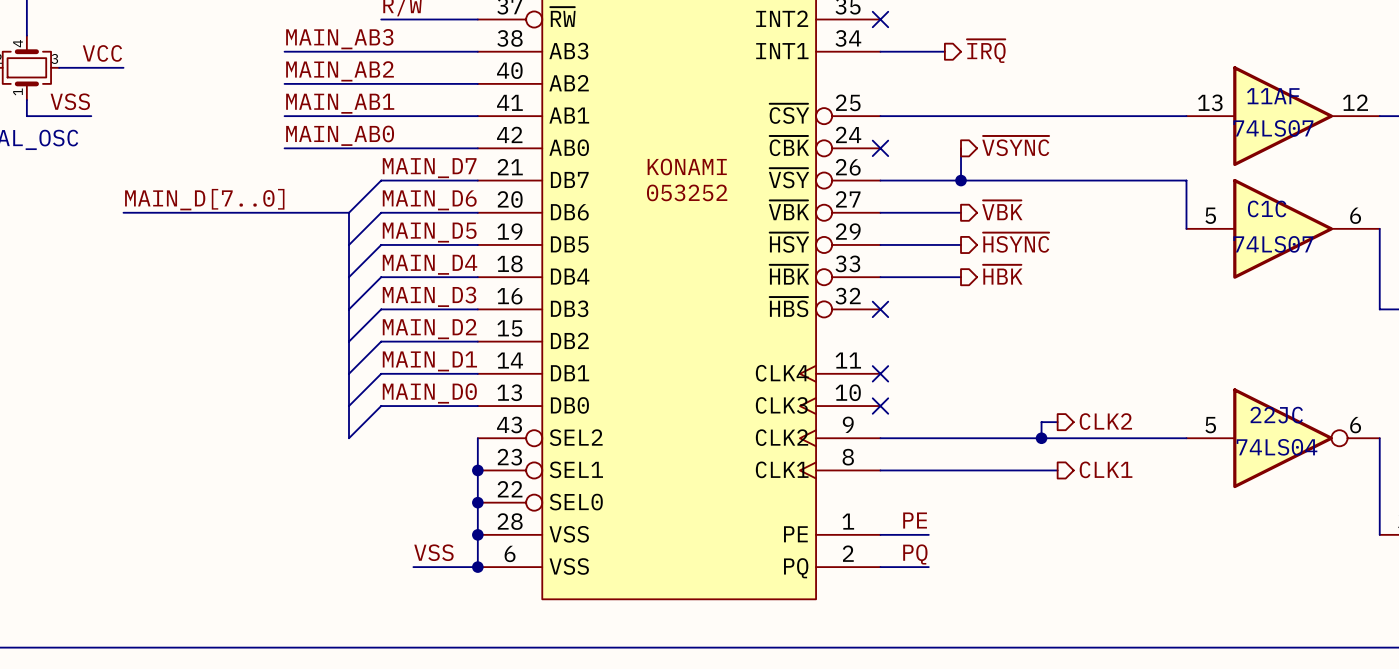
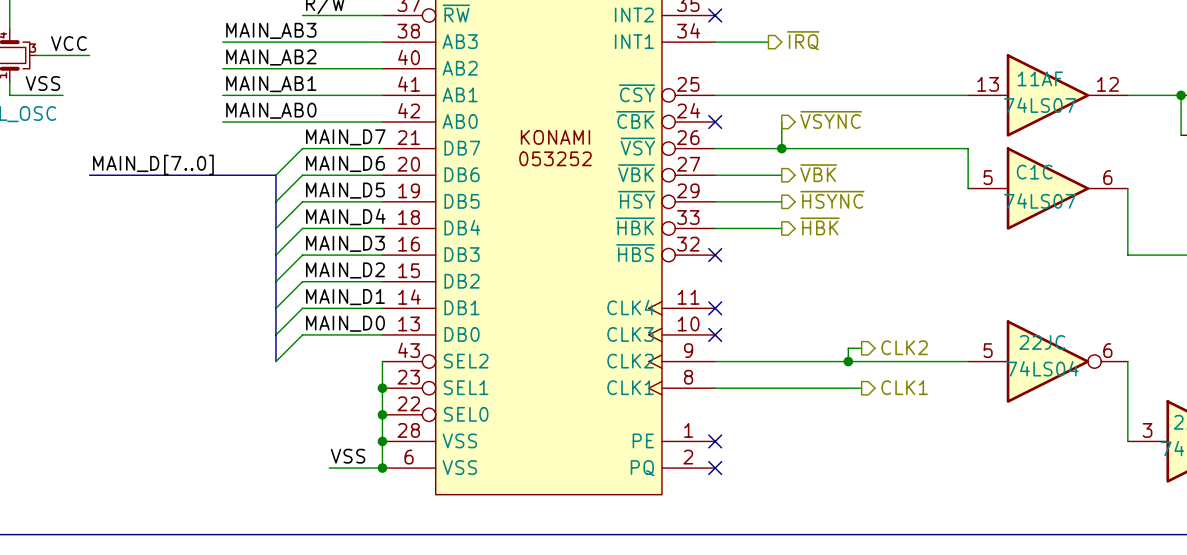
label: PE (915, 520) -> none
wire: (880, 534) (928, 534) -> none
no-connect mark: none -> (715, 441)
label: PQ (915, 554) -> none
wire: (880, 567) (928, 567) -> none
no-connect mark: none -> (715, 468)

